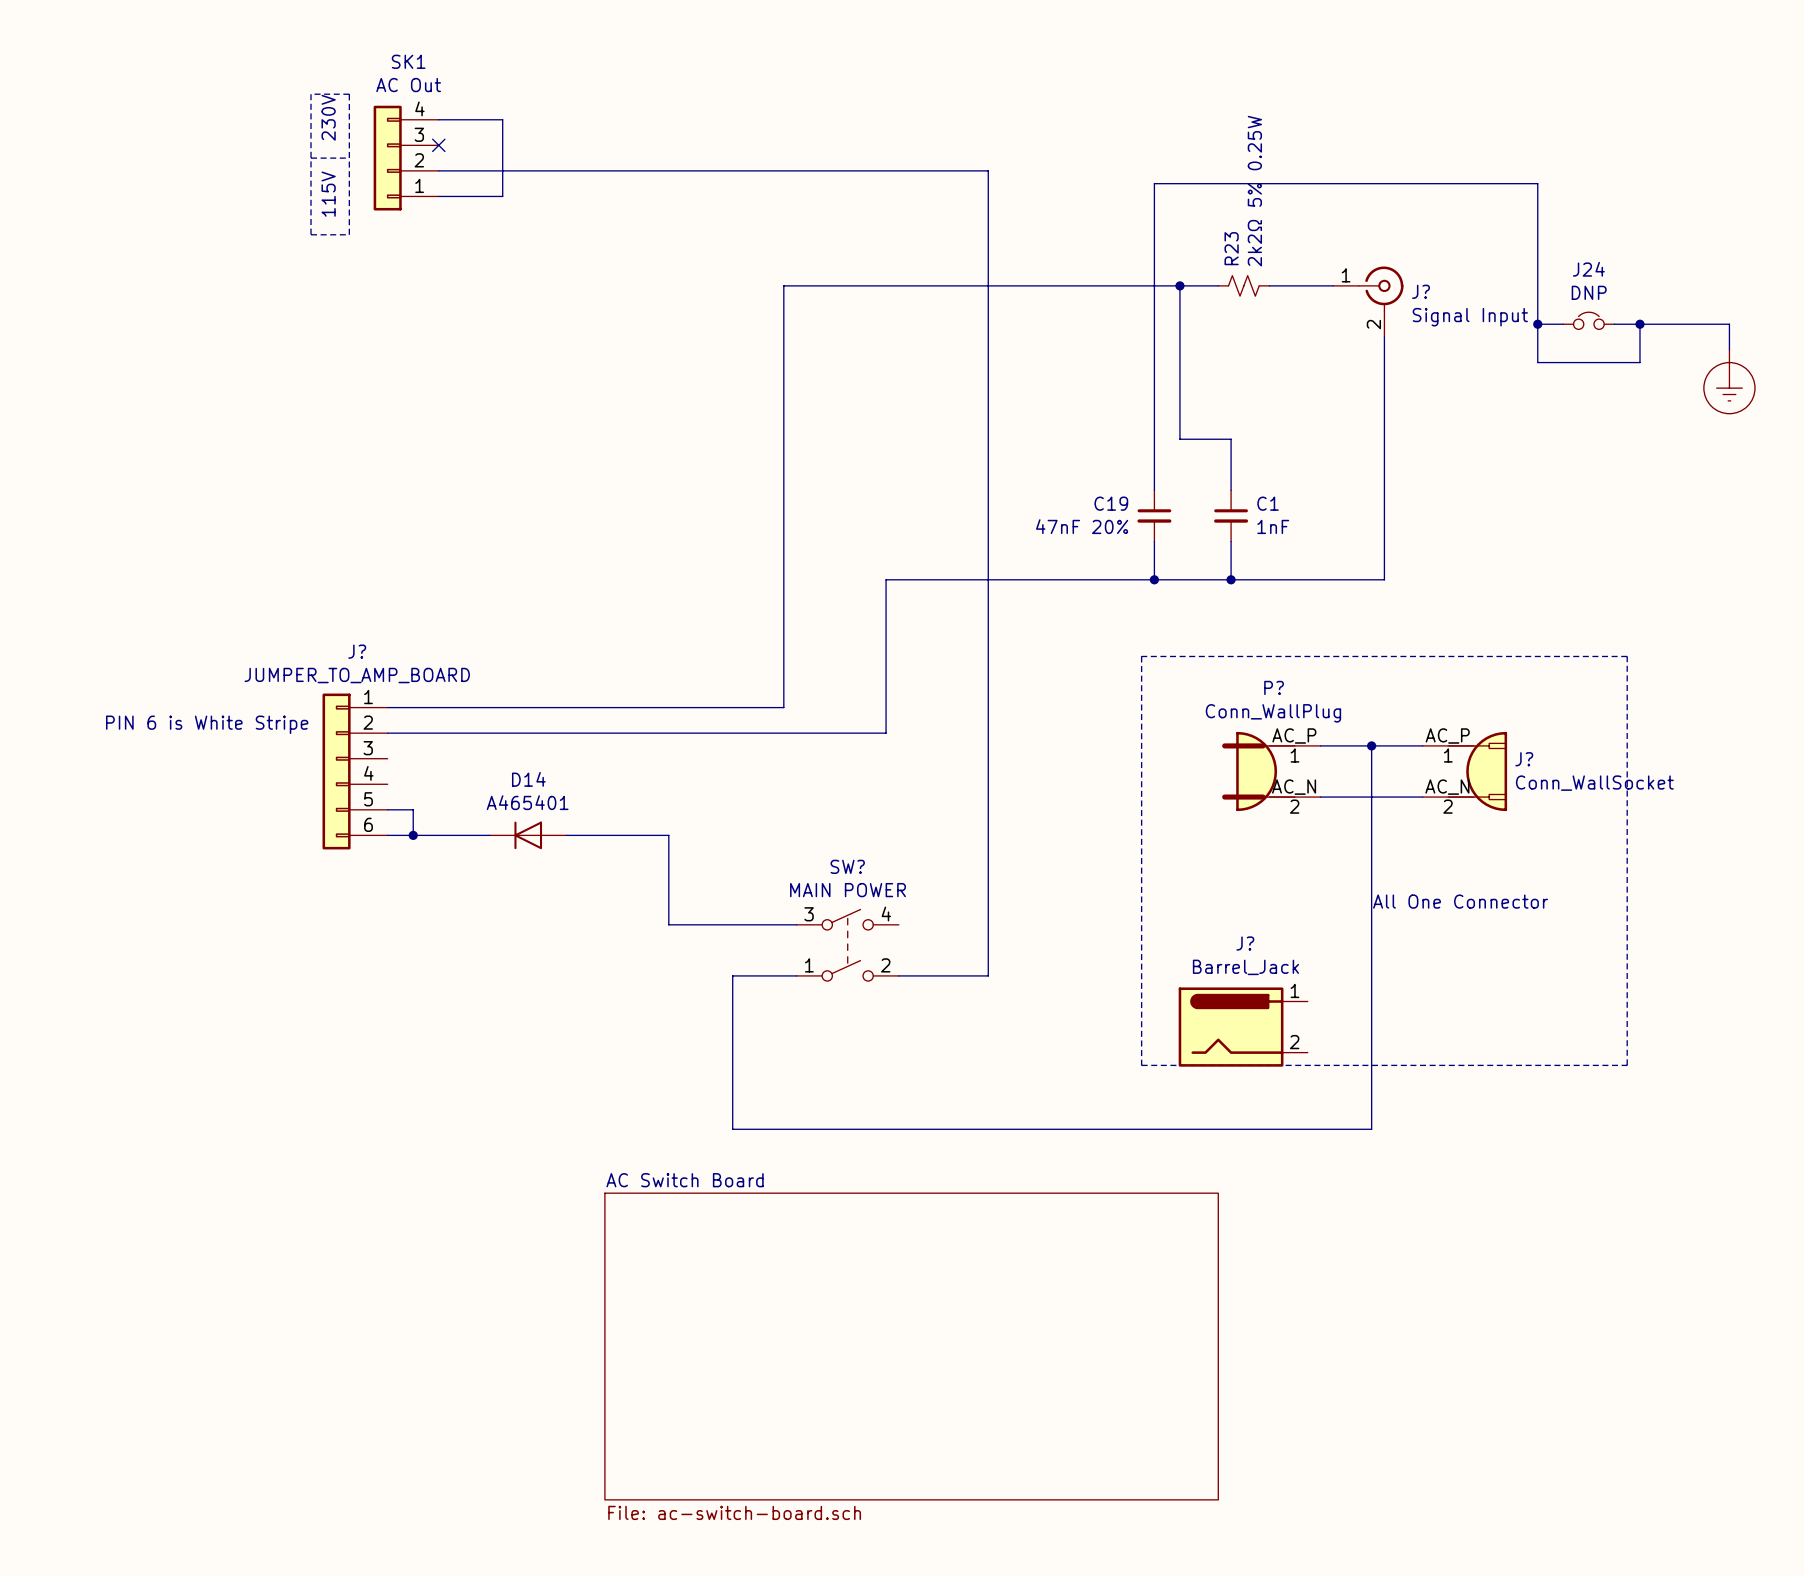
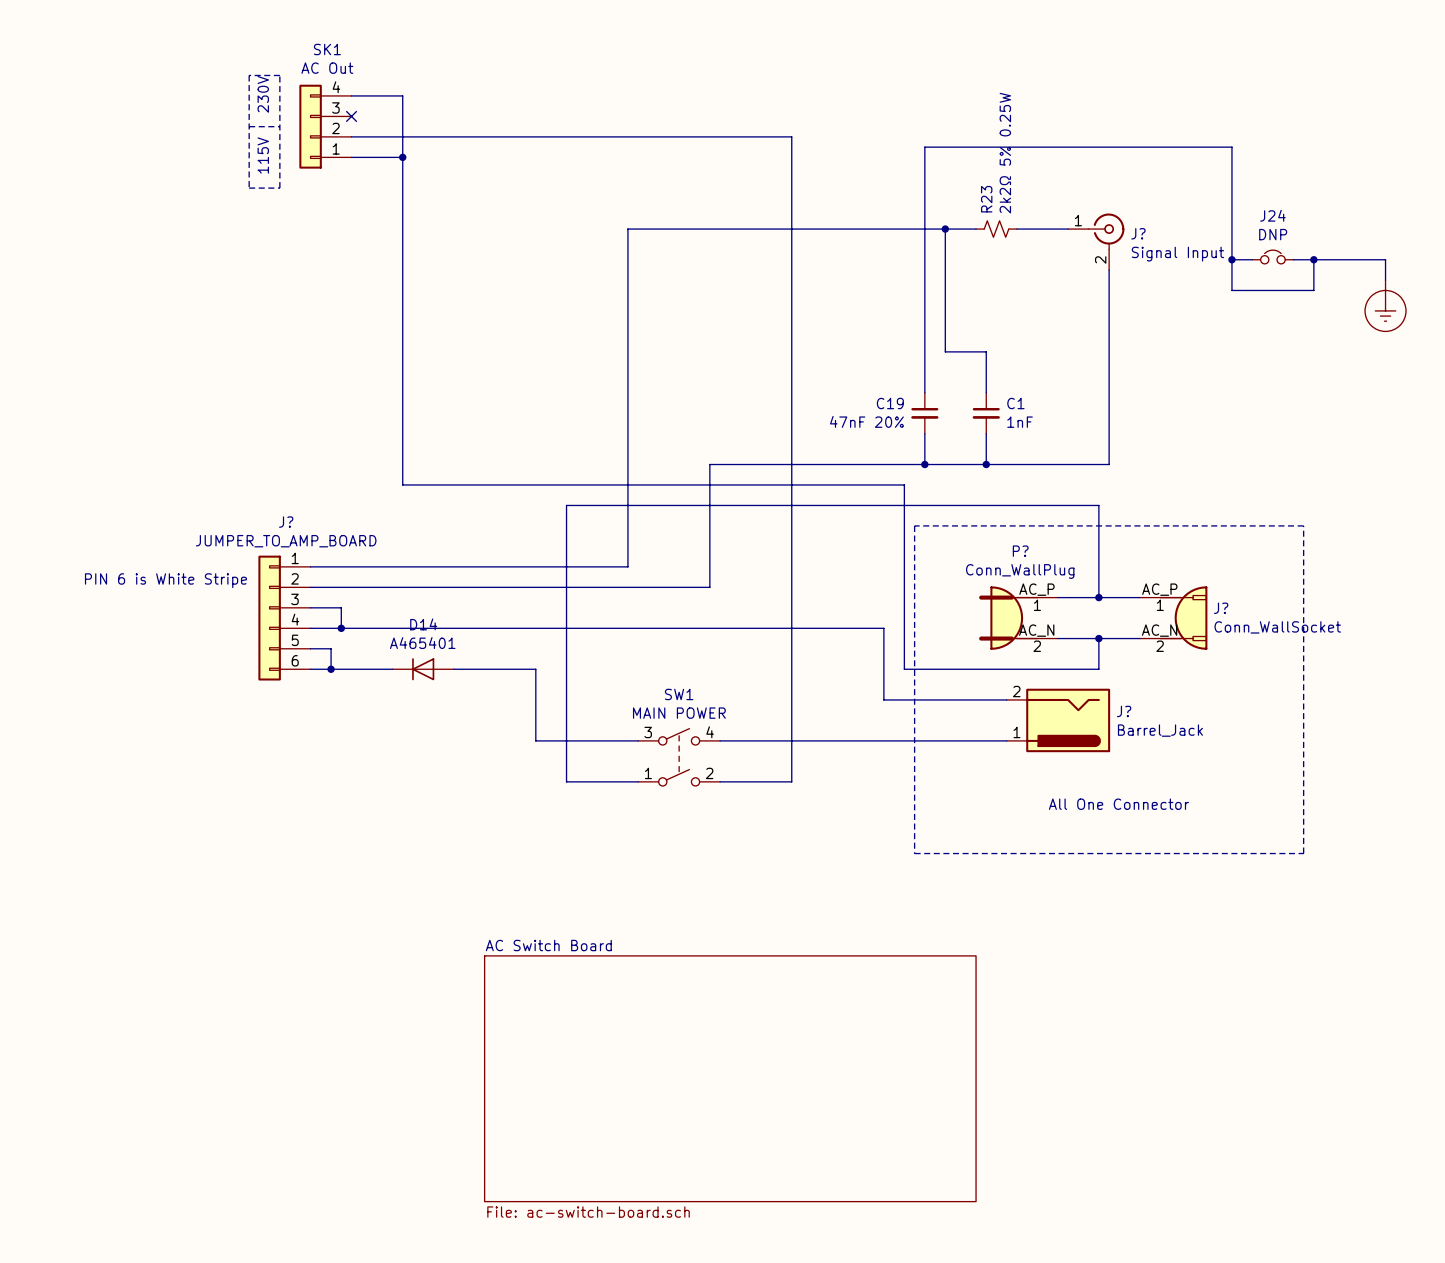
wire: none -> (402, 157) (402, 484) (904, 484) (904, 669) (1098, 669)
junction: none -> (402, 157)
wire: (1371, 745) (1371, 797) -> none
wire: none -> (310, 607) (341, 607) (341, 628)
wire: none -> (310, 628) (883, 628) (883, 699) (1006, 699)
junction: none -> (341, 628)
junction: none -> (1098, 638)
wire: (1371, 835) (1371, 1129) (732, 1129) (732, 975) -> (1098, 597) (1098, 505) (566, 505) (566, 781) (587, 781)
SW? name: SW? (847, 866) -> SW1 (679, 694)
text position: All One Connector (1460, 901) -> All One Connector (1118, 804)
wire: none -> (720, 740) (1006, 740)
J? name position: J? (1245, 943) -> J? (1124, 711)
J? value position: Barrel_Jack (1245, 967) -> Barrel_Jack (1160, 730)
J? rotation: 0° (1231, 1027) -> 180° (1068, 720)
J? position: (1243, 1027) -> (1058, 720)

